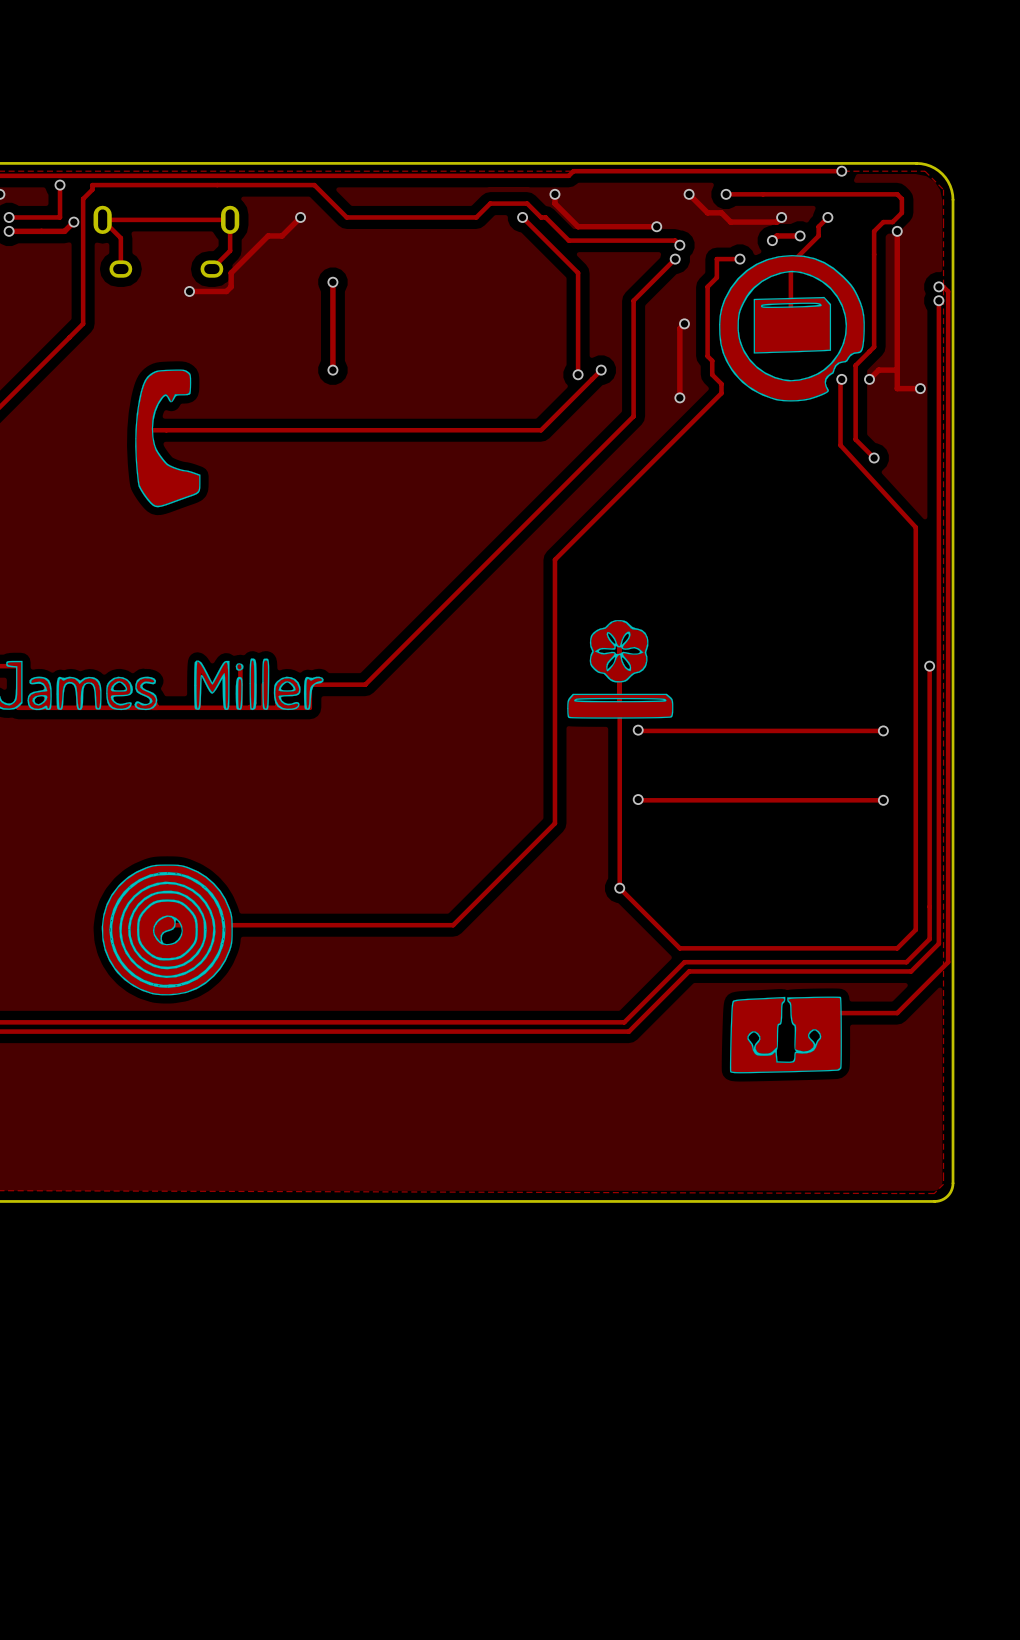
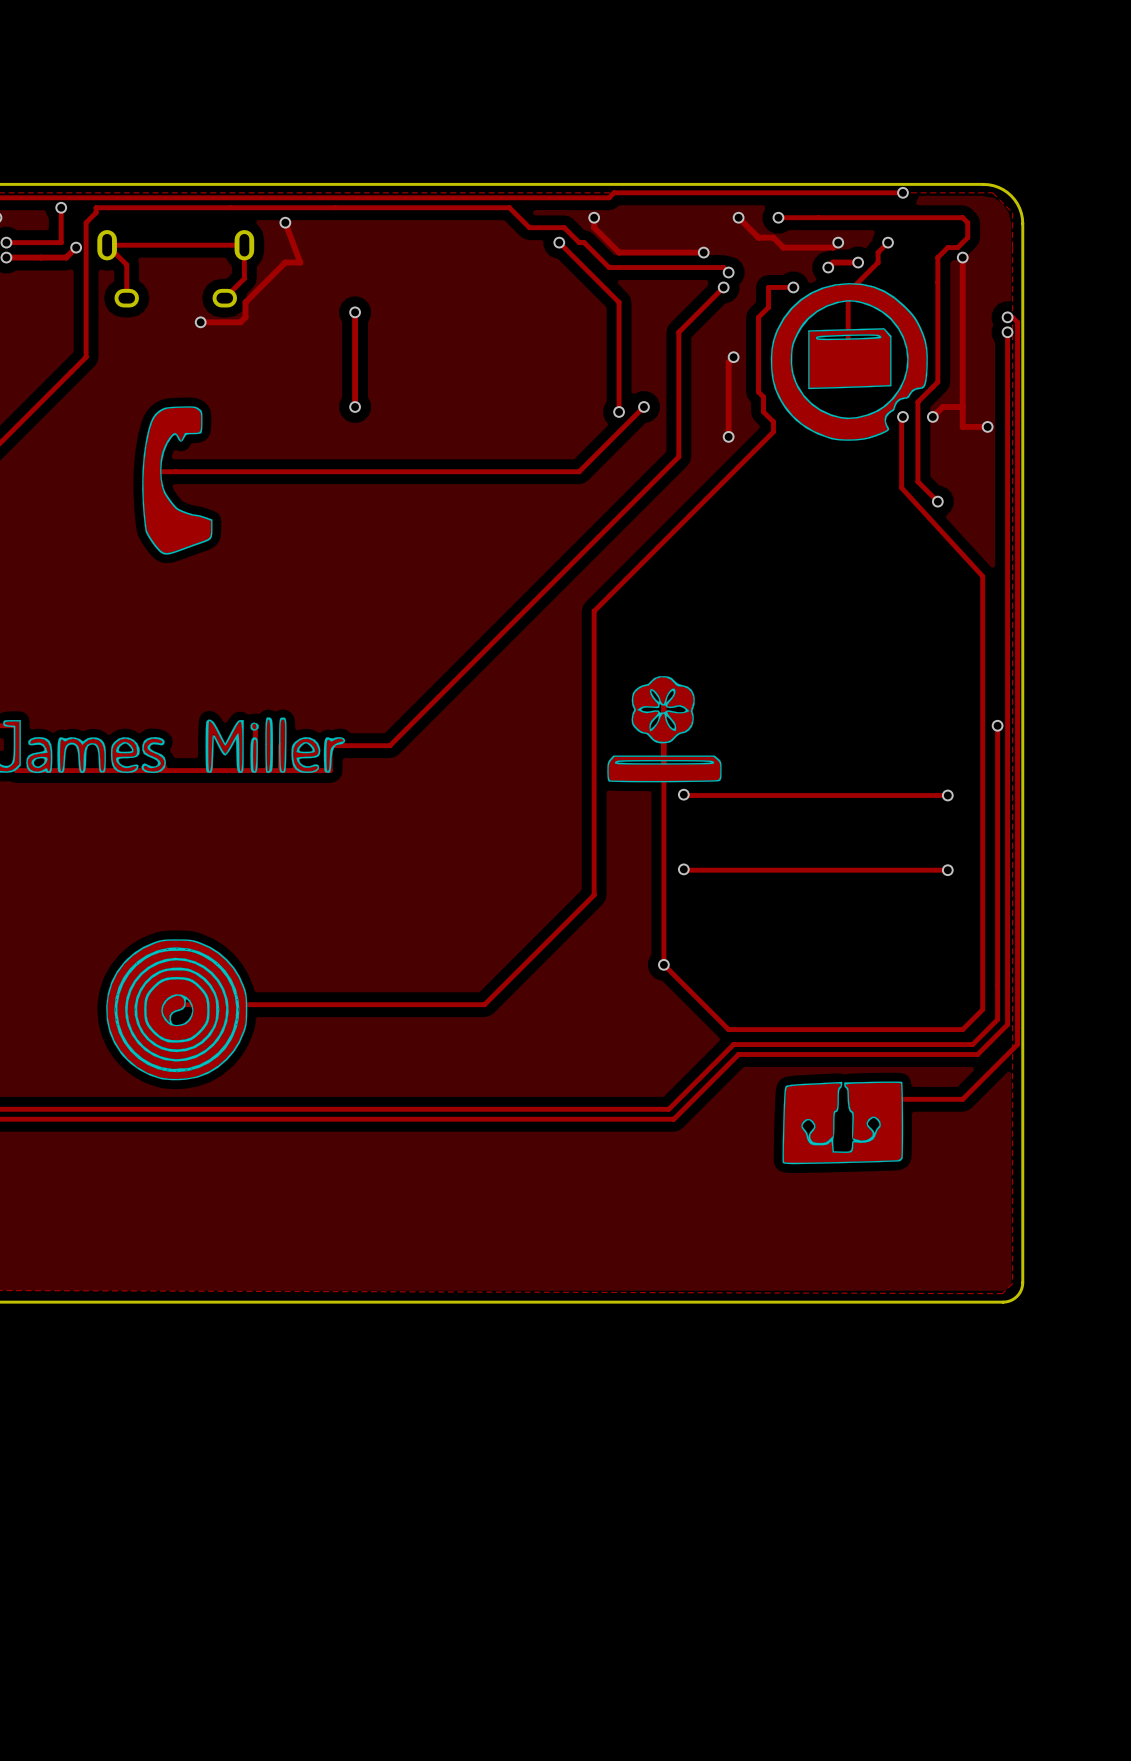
track: (314, 185) (346, 217) (476, 217) (490, 203) (494, 203) -> (335, 207) (509, 207) (529, 227)
track: (300, 217) (282, 235) -> (285, 222) (300, 262)
via position: (300, 217) -> (285, 222)

